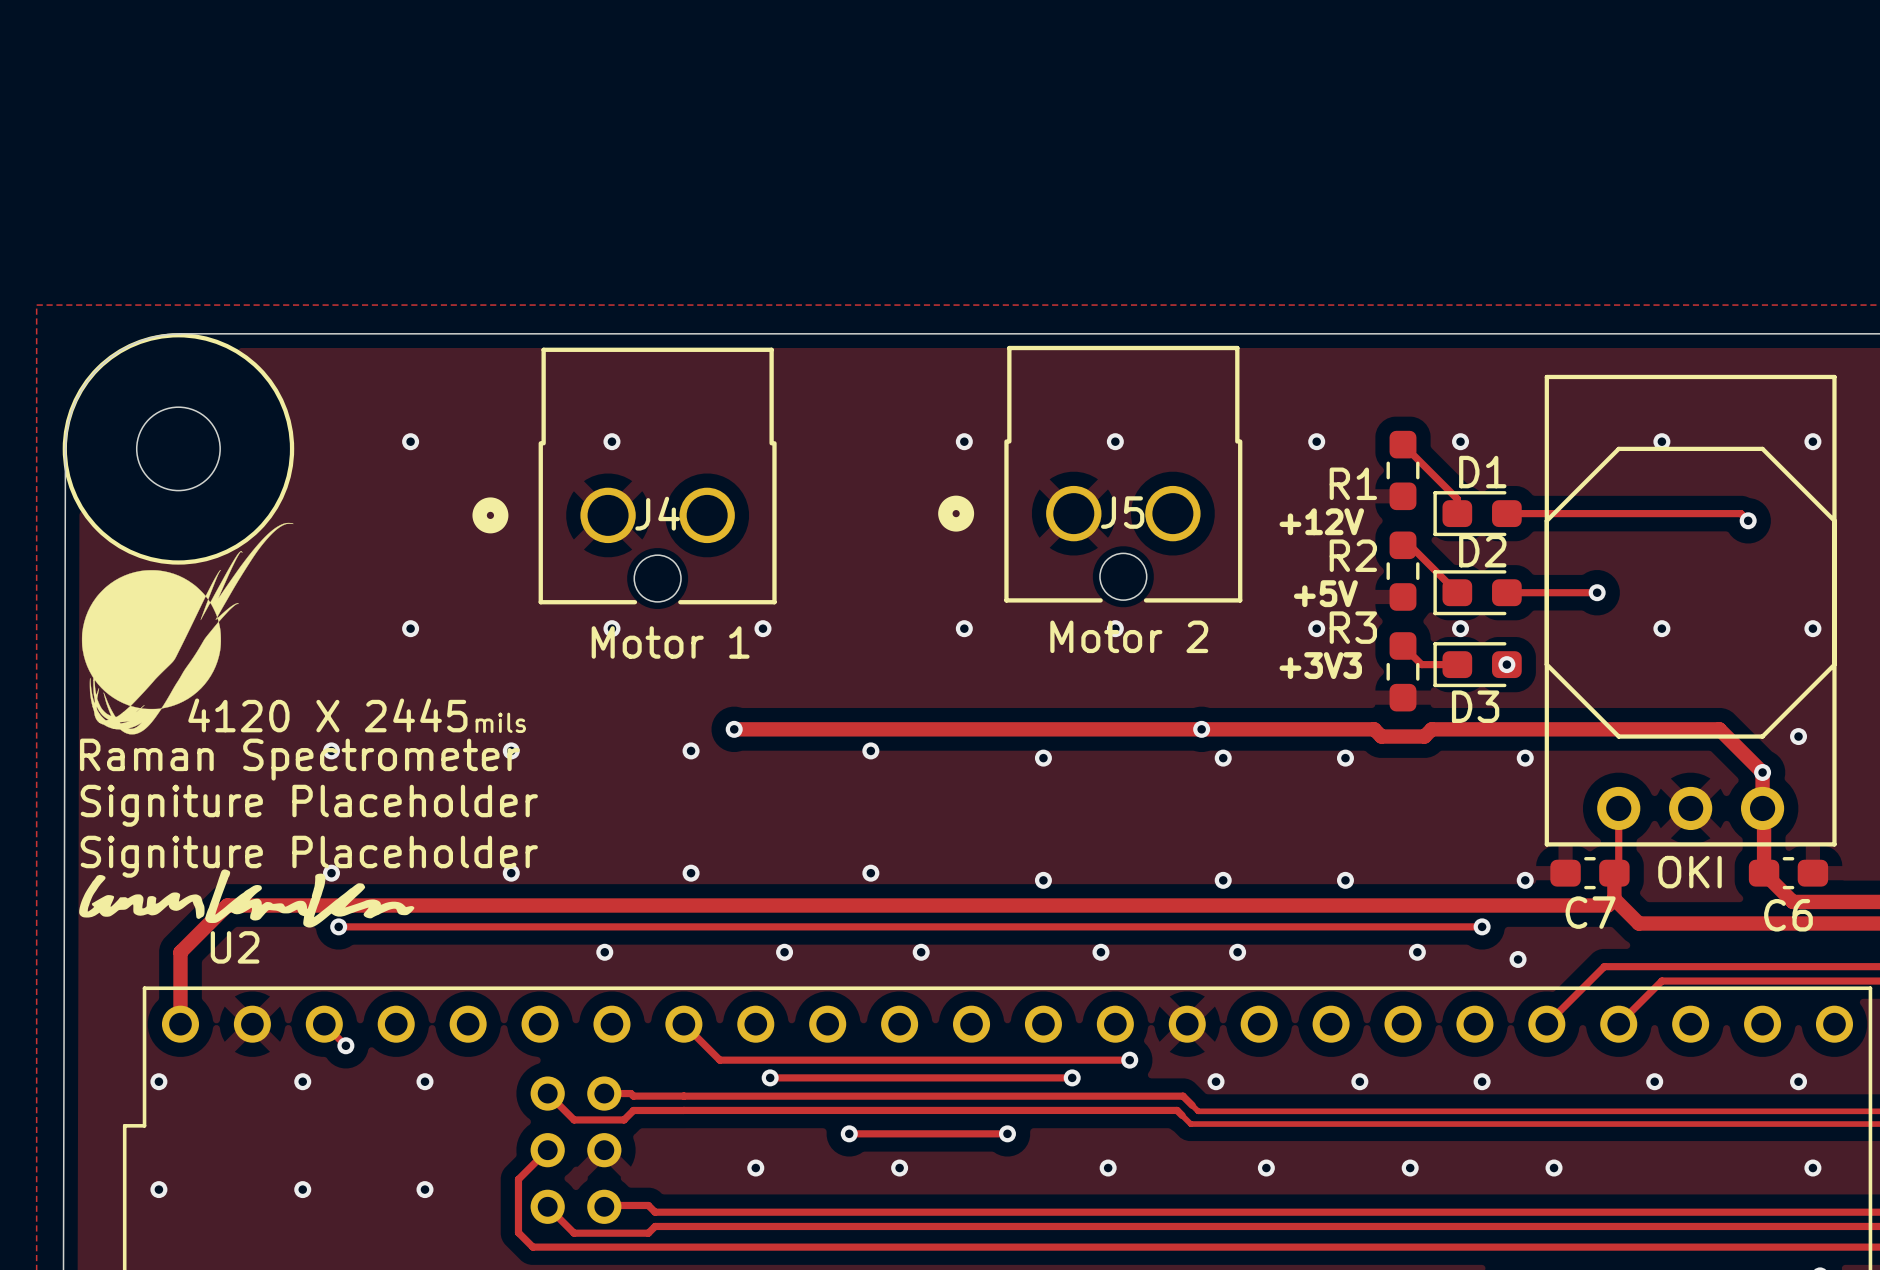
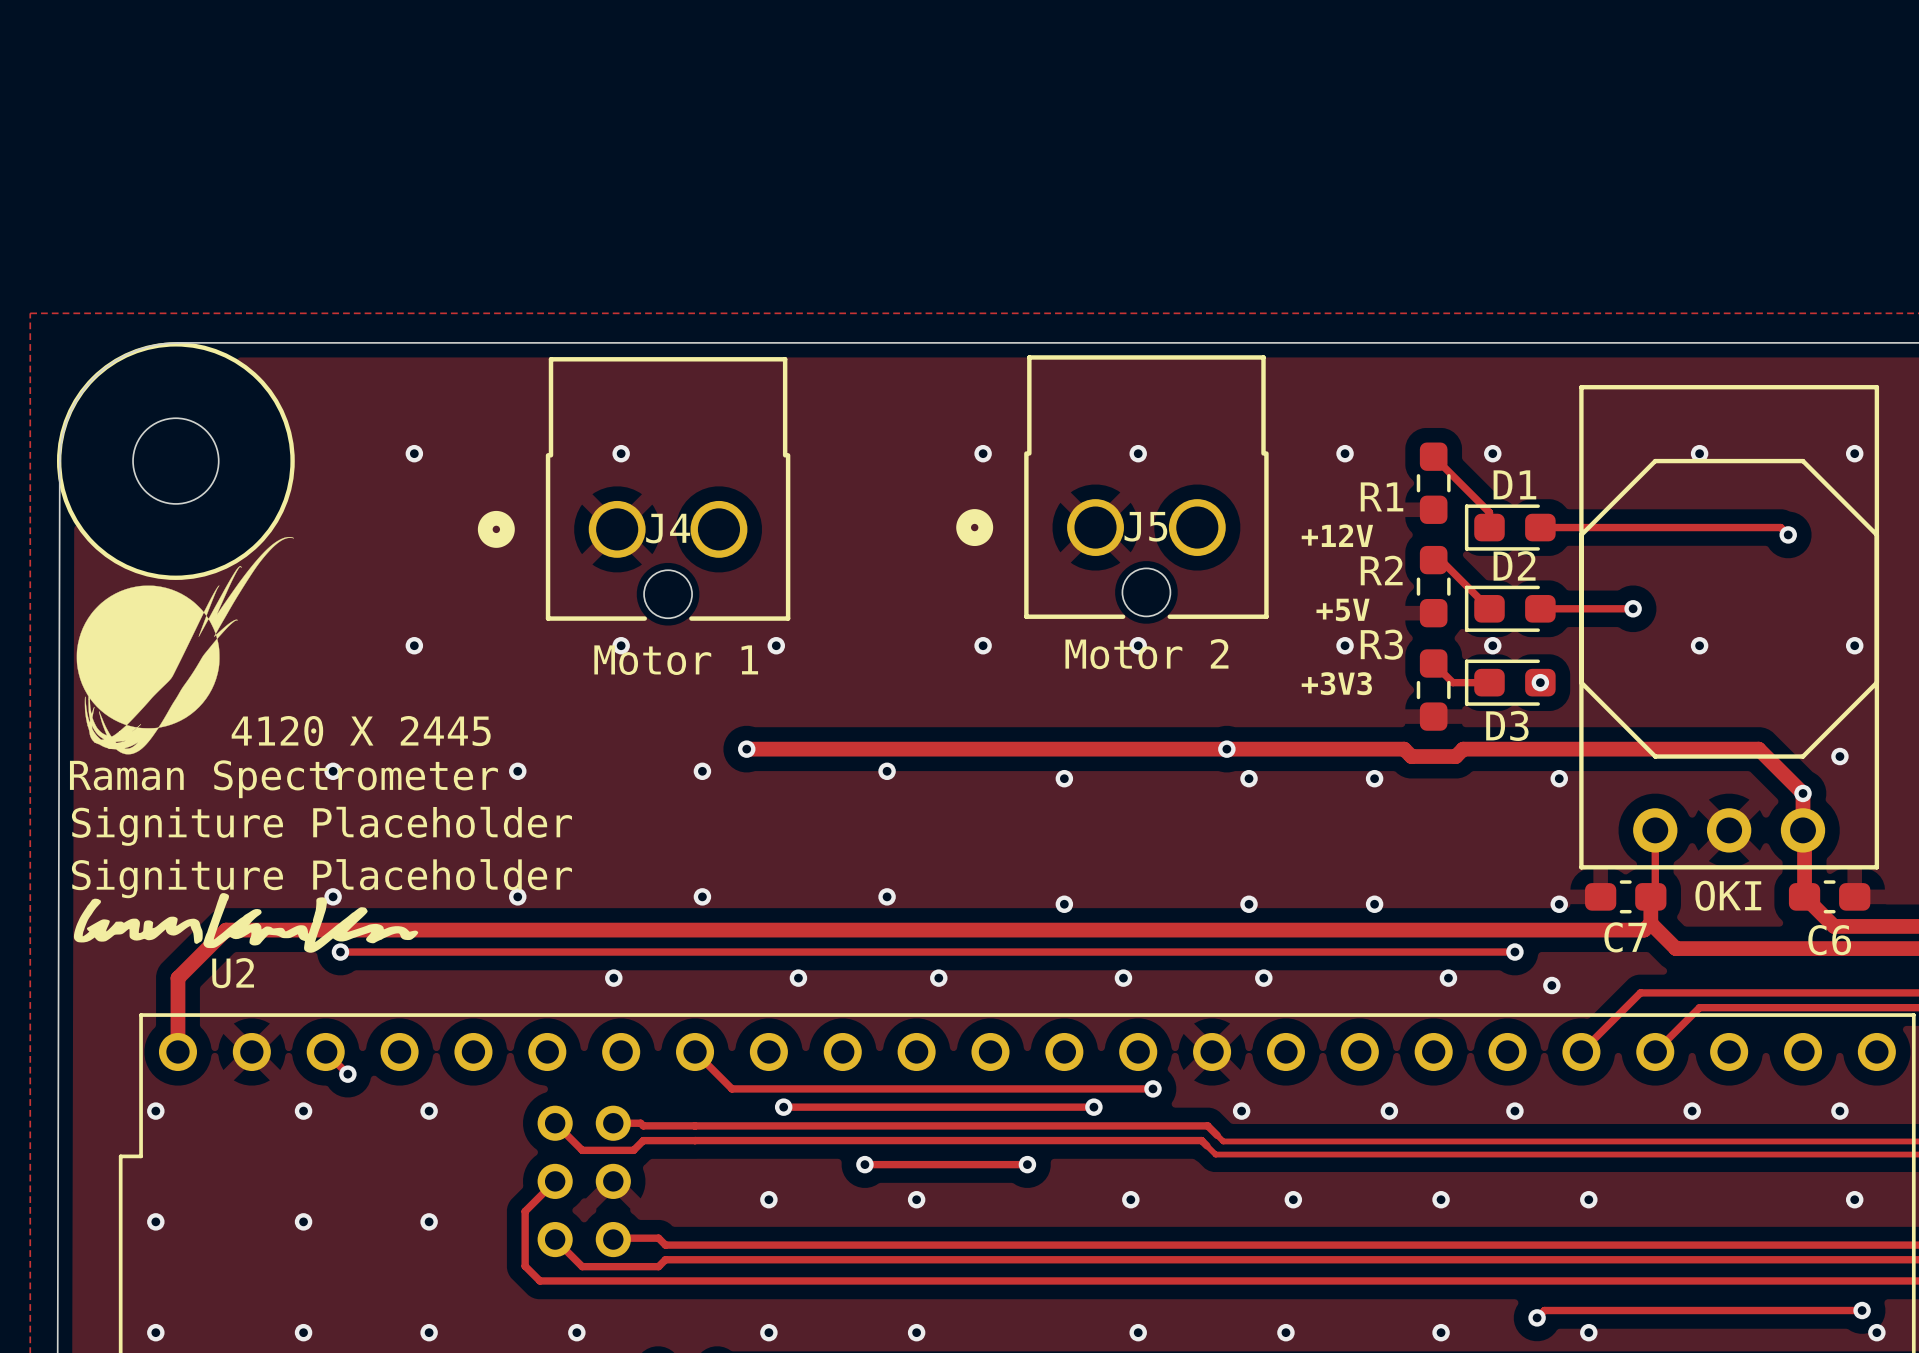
text position: 4120 X 2445 (327, 715) -> 4120 X 2445 (361, 731)
text: mils (500, 722) -> none

